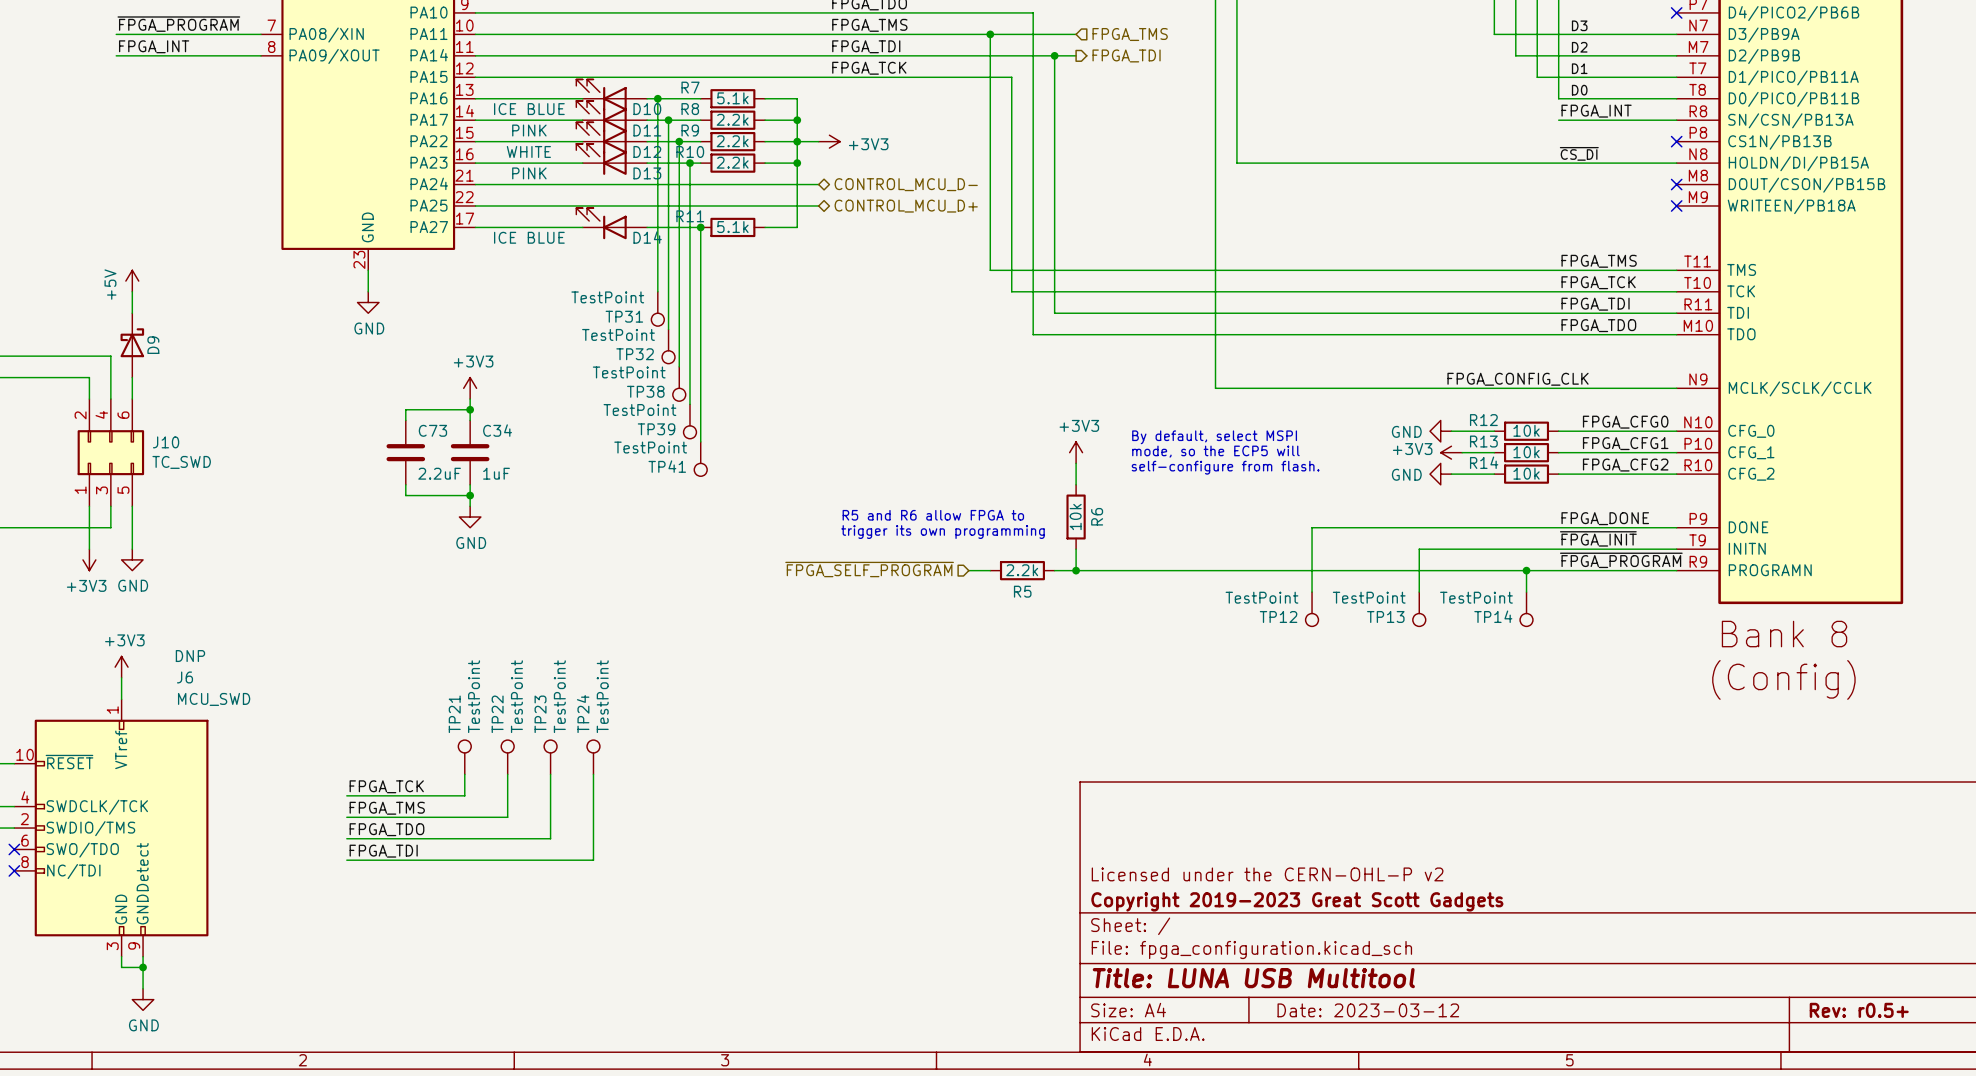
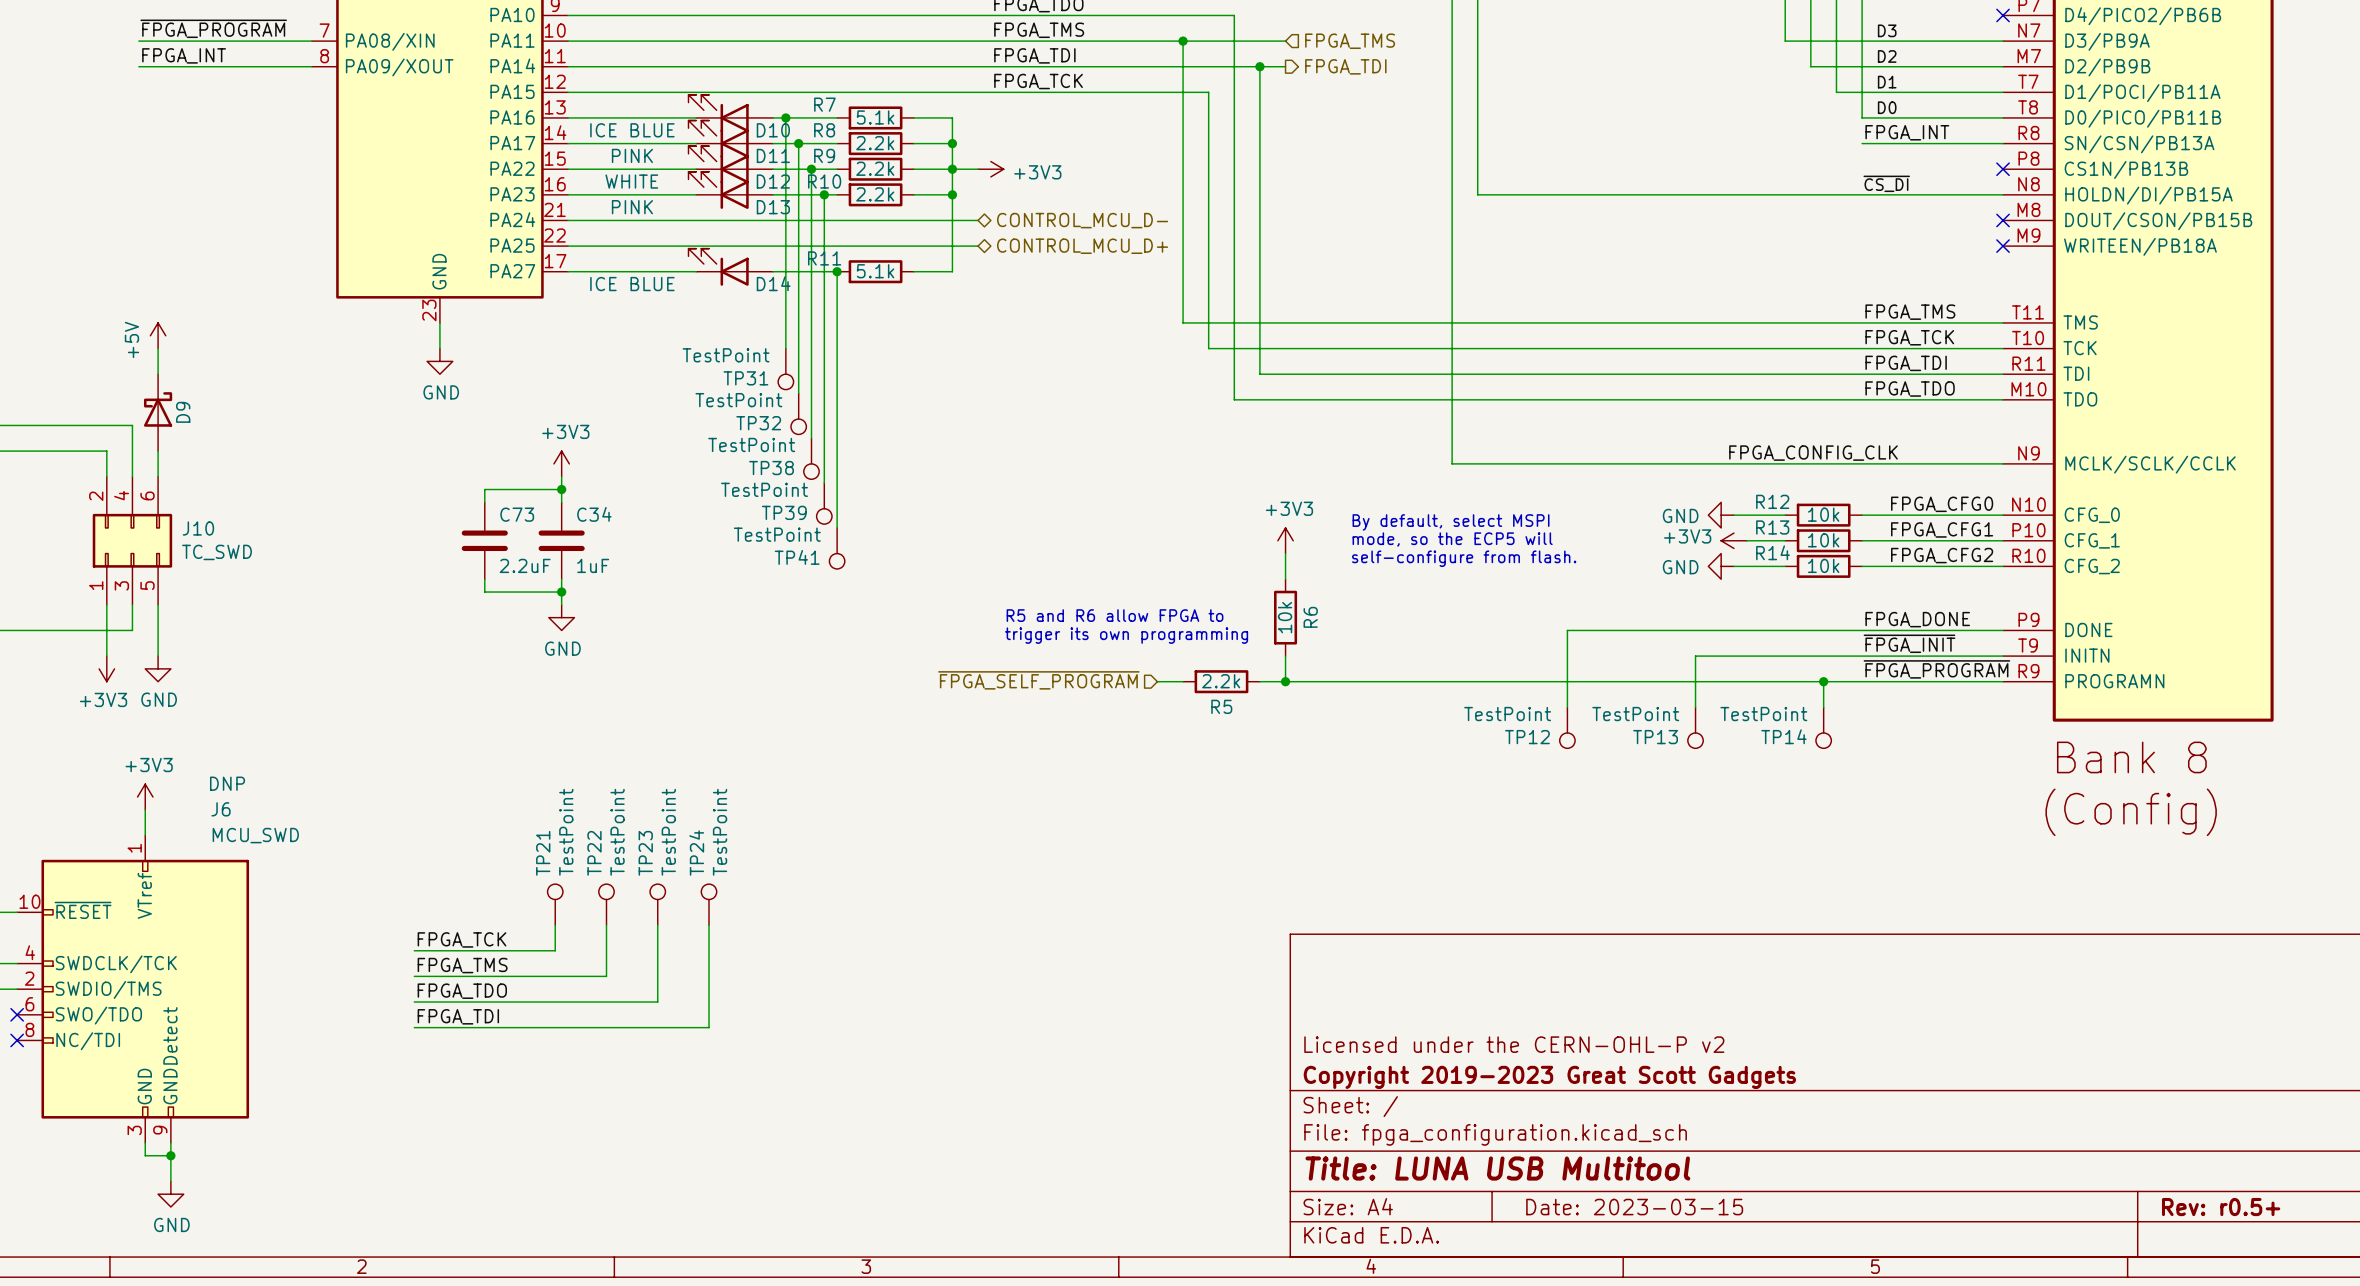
part pin name: D1/PICO/PB11A (1793, 77) -> D1/POCI/PB11A (2142, 93)
title block: Date: 2023-03-12 (1368, 1010) -> Date: 2023-03-15 (1634, 1207)

